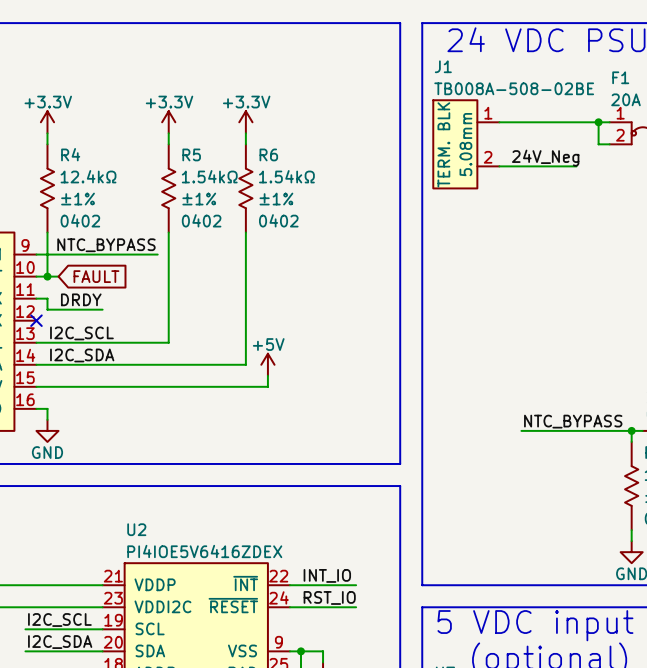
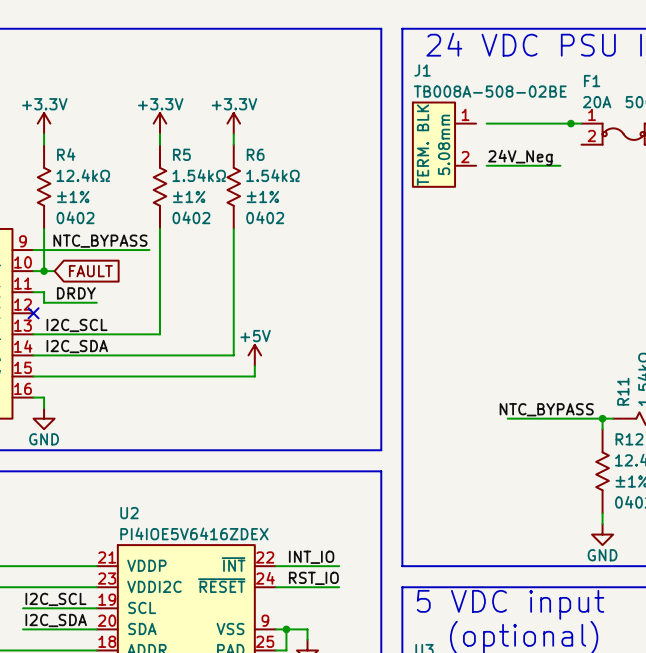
wire: (499, 122) (510, 122) -> none
wire: (598, 122) (598, 144) (609, 144) -> none
wire: (499, 166) (510, 166) -> (549, 165) (560, 165)
wire: (521, 430) (532, 430) -> none

